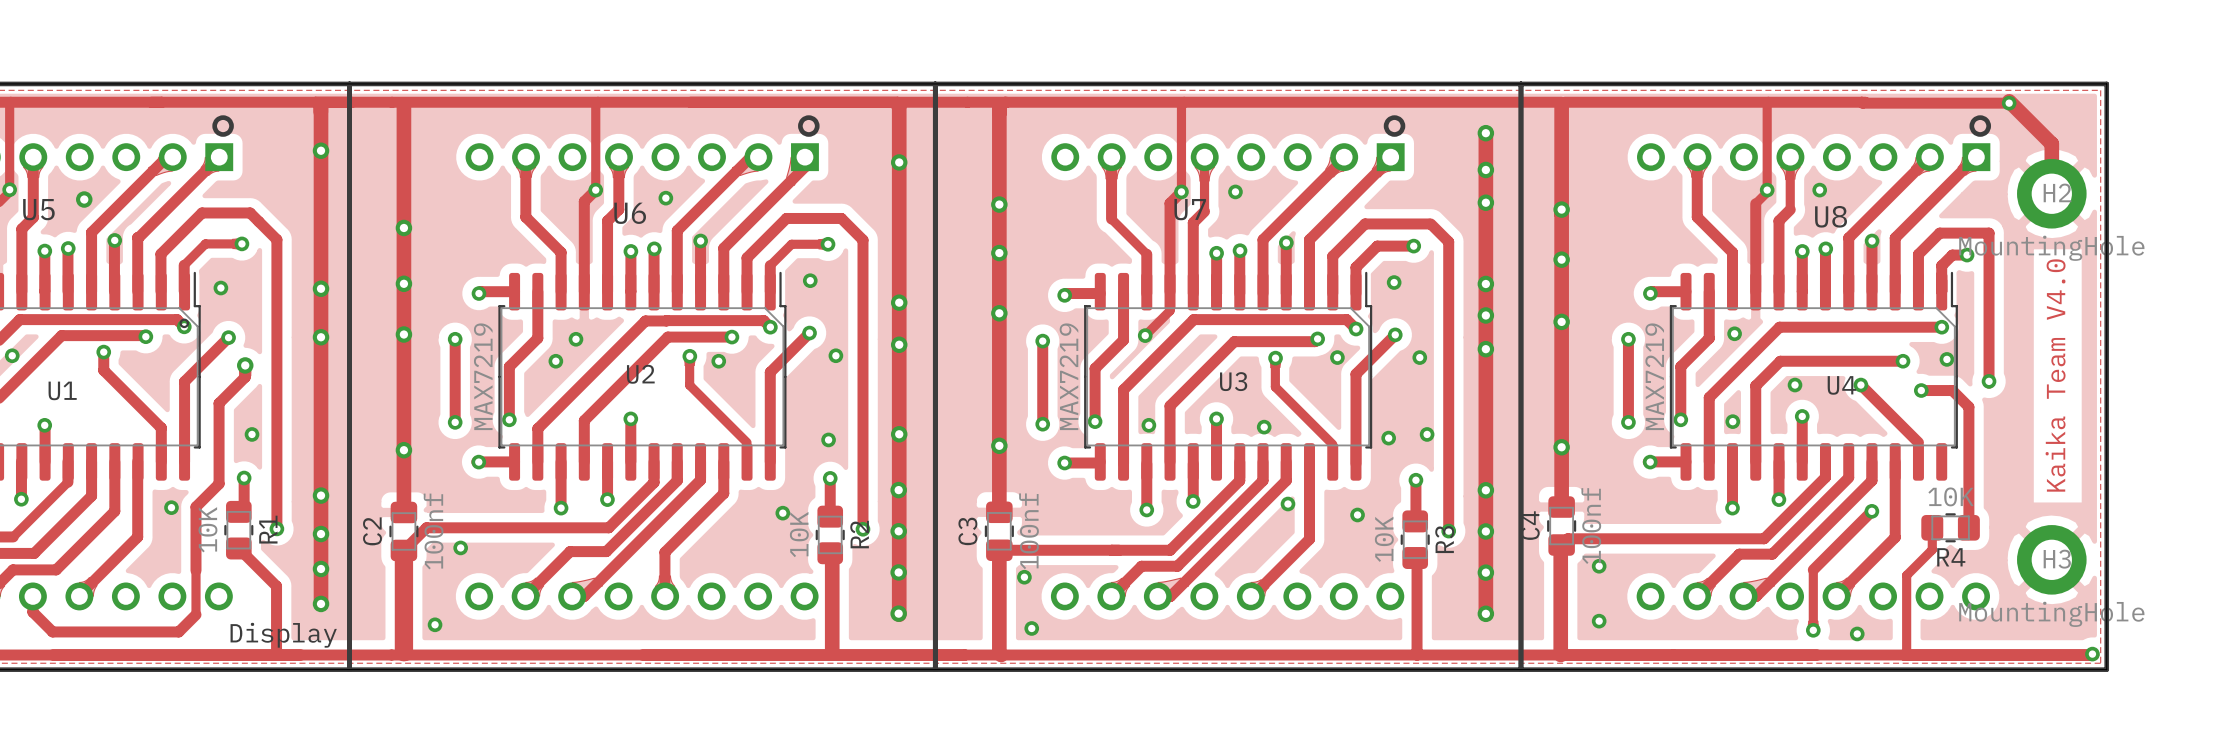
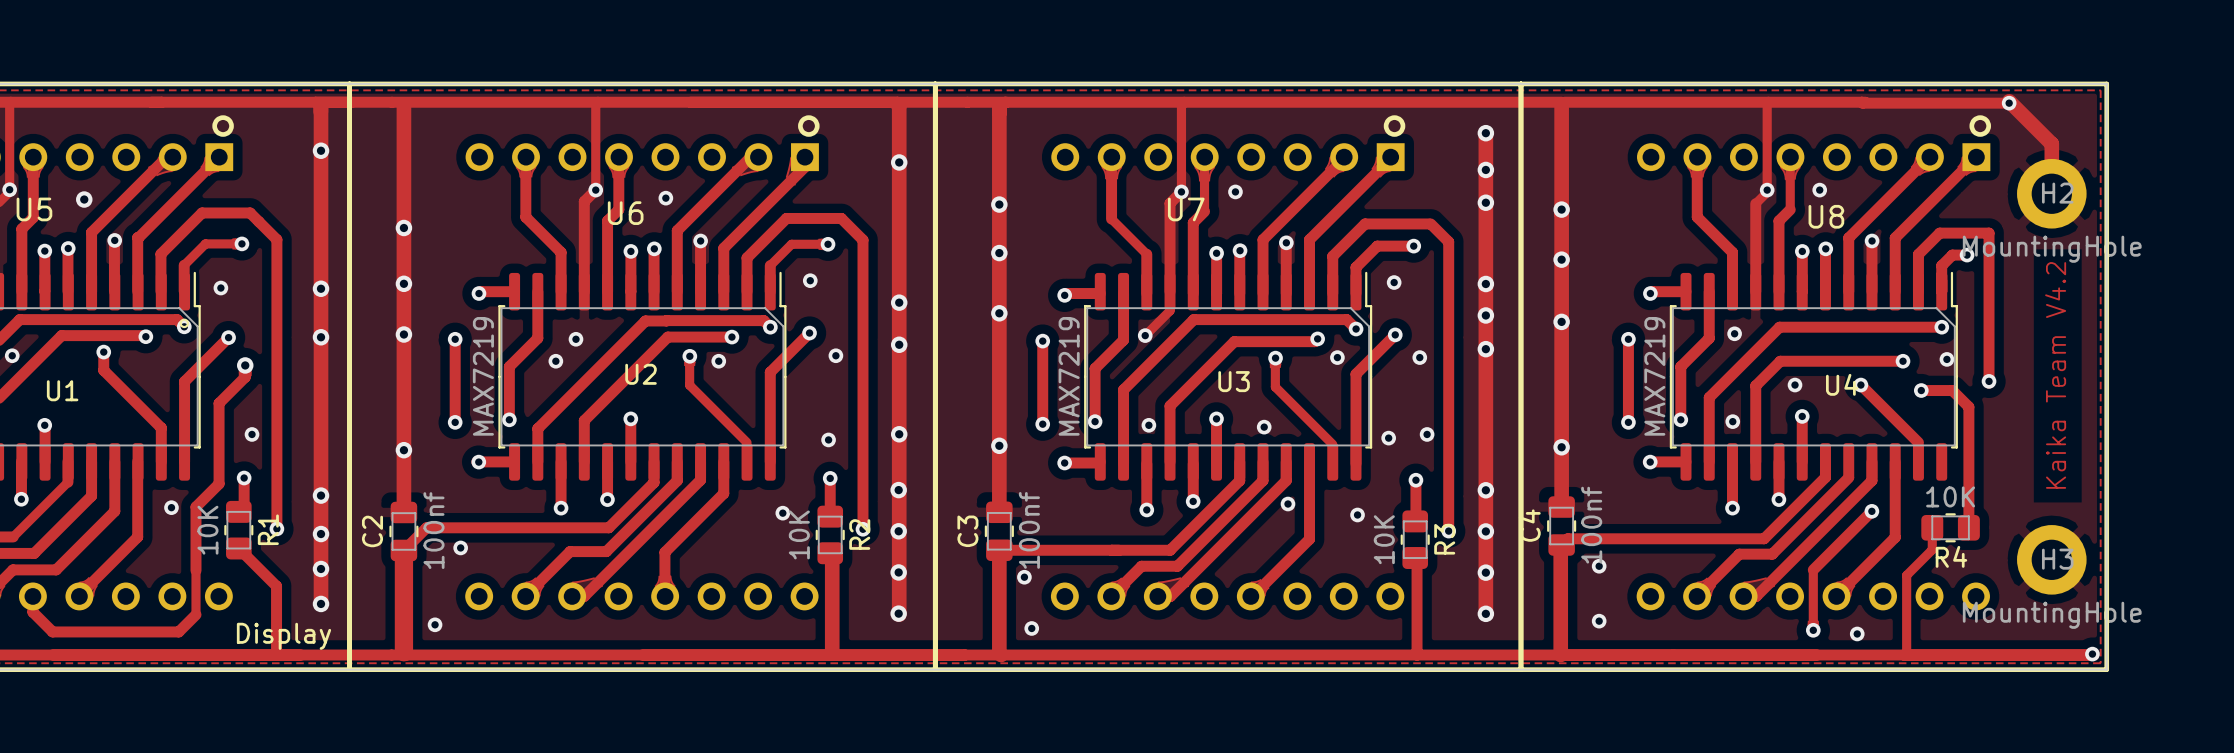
text: Kaika Team V4.0 (2055, 375) -> Kaika Team V4.2 (2055, 375)

